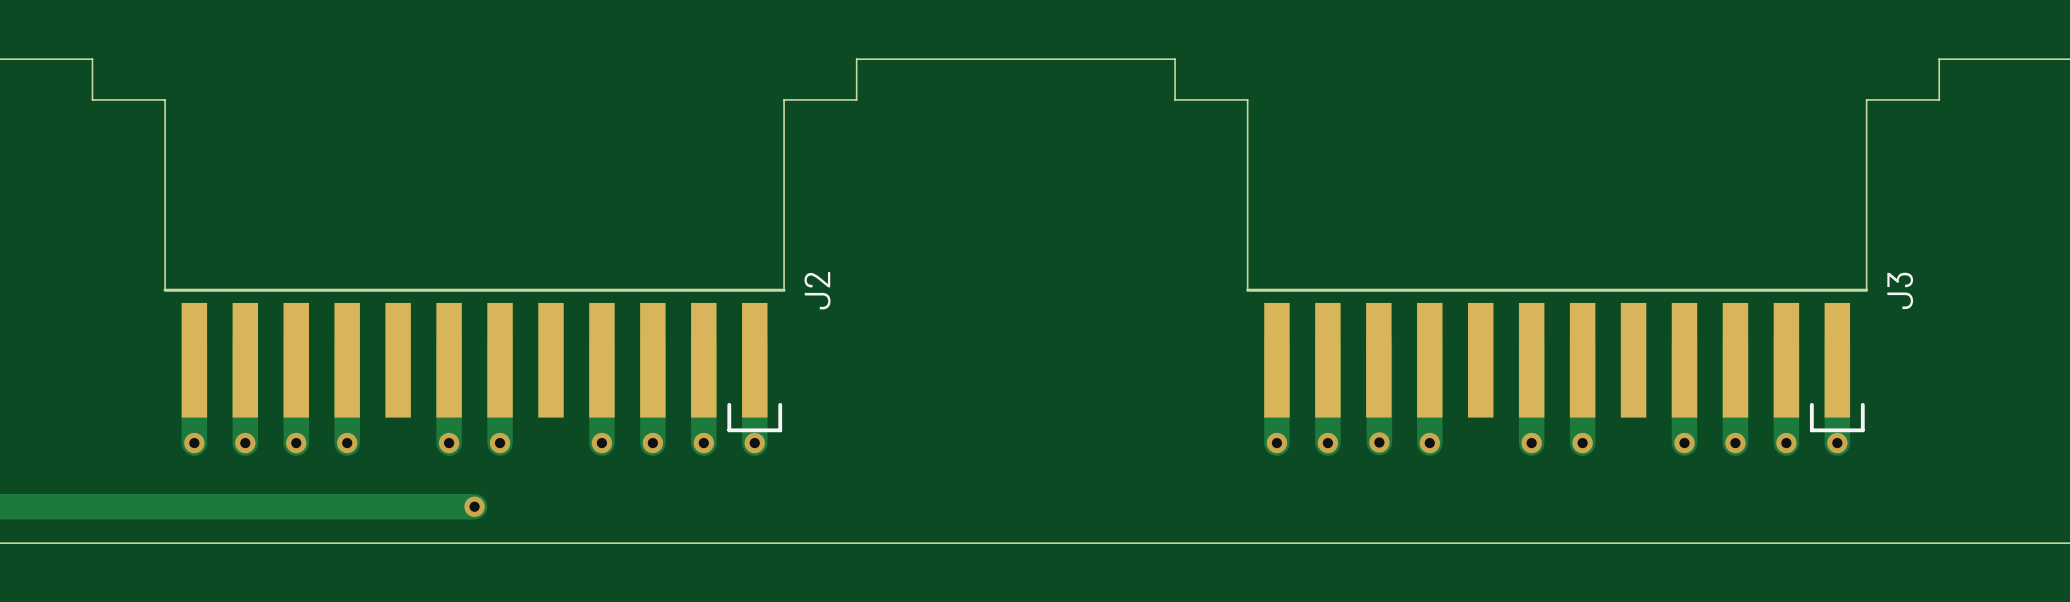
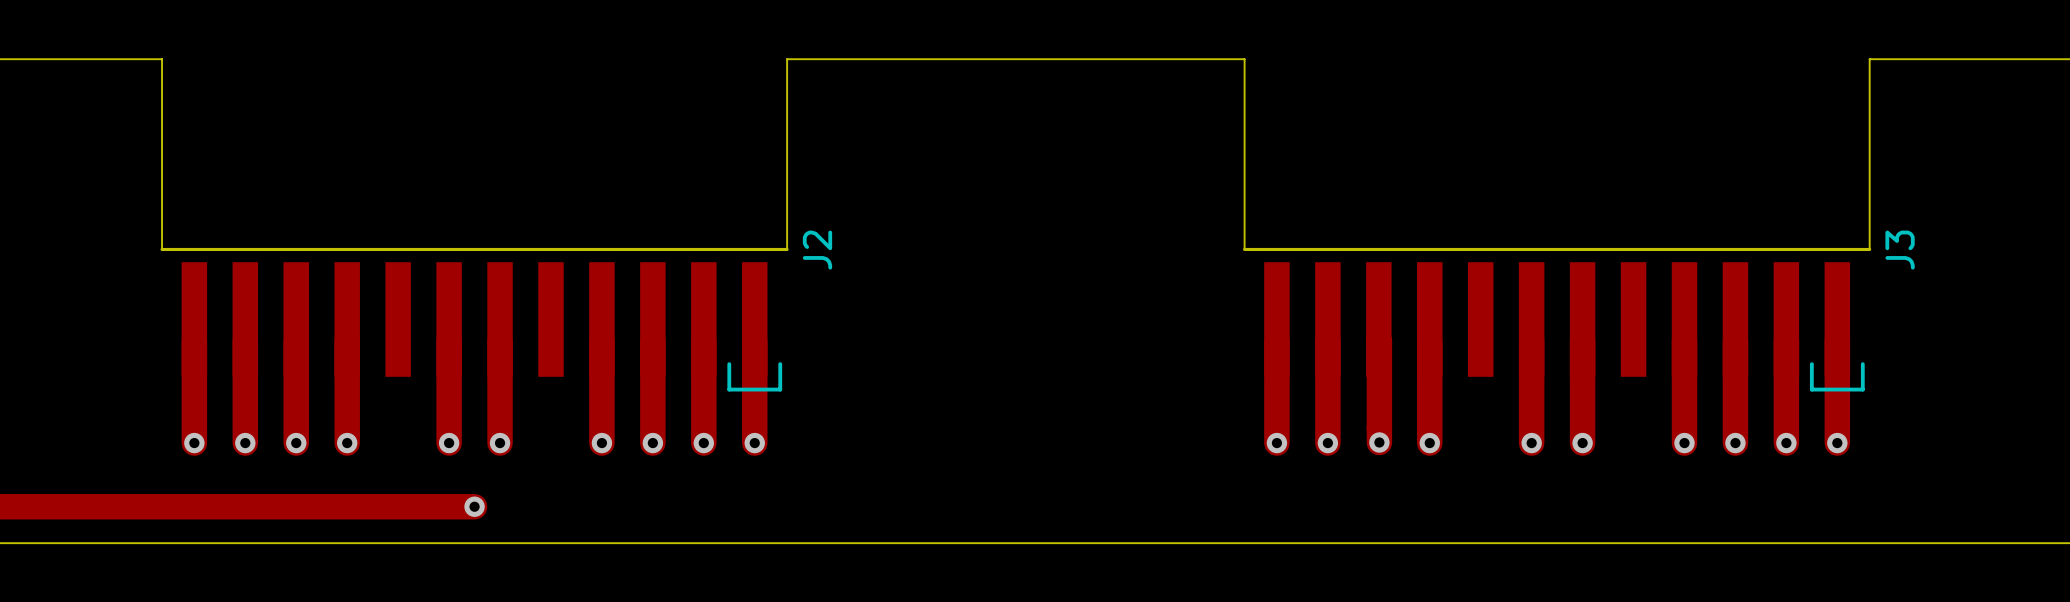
board edge: (92, 59) (92, 99) (165, 99) (165, 290) -> (92, 59) (162, 59) (162, 249)
board edge: (856, 59) (856, 99) (784, 99) (784, 290) -> (856, 59) (787, 59) (787, 249)
board edge: (1175, 59) (1175, 99) (1247, 99) (1247, 290) -> (1175, 59) (1244, 59) (1244, 249)
board edge: (1939, 59) (1939, 99) (1866, 99) (1866, 290) -> (1939, 59) (1869, 59) (1869, 249)
J2 footprint: [163, 288, 786, 433] -> [160, 247, 789, 392]
J3 footprint: [1246, 288, 1869, 433] -> [1243, 247, 1872, 392]

